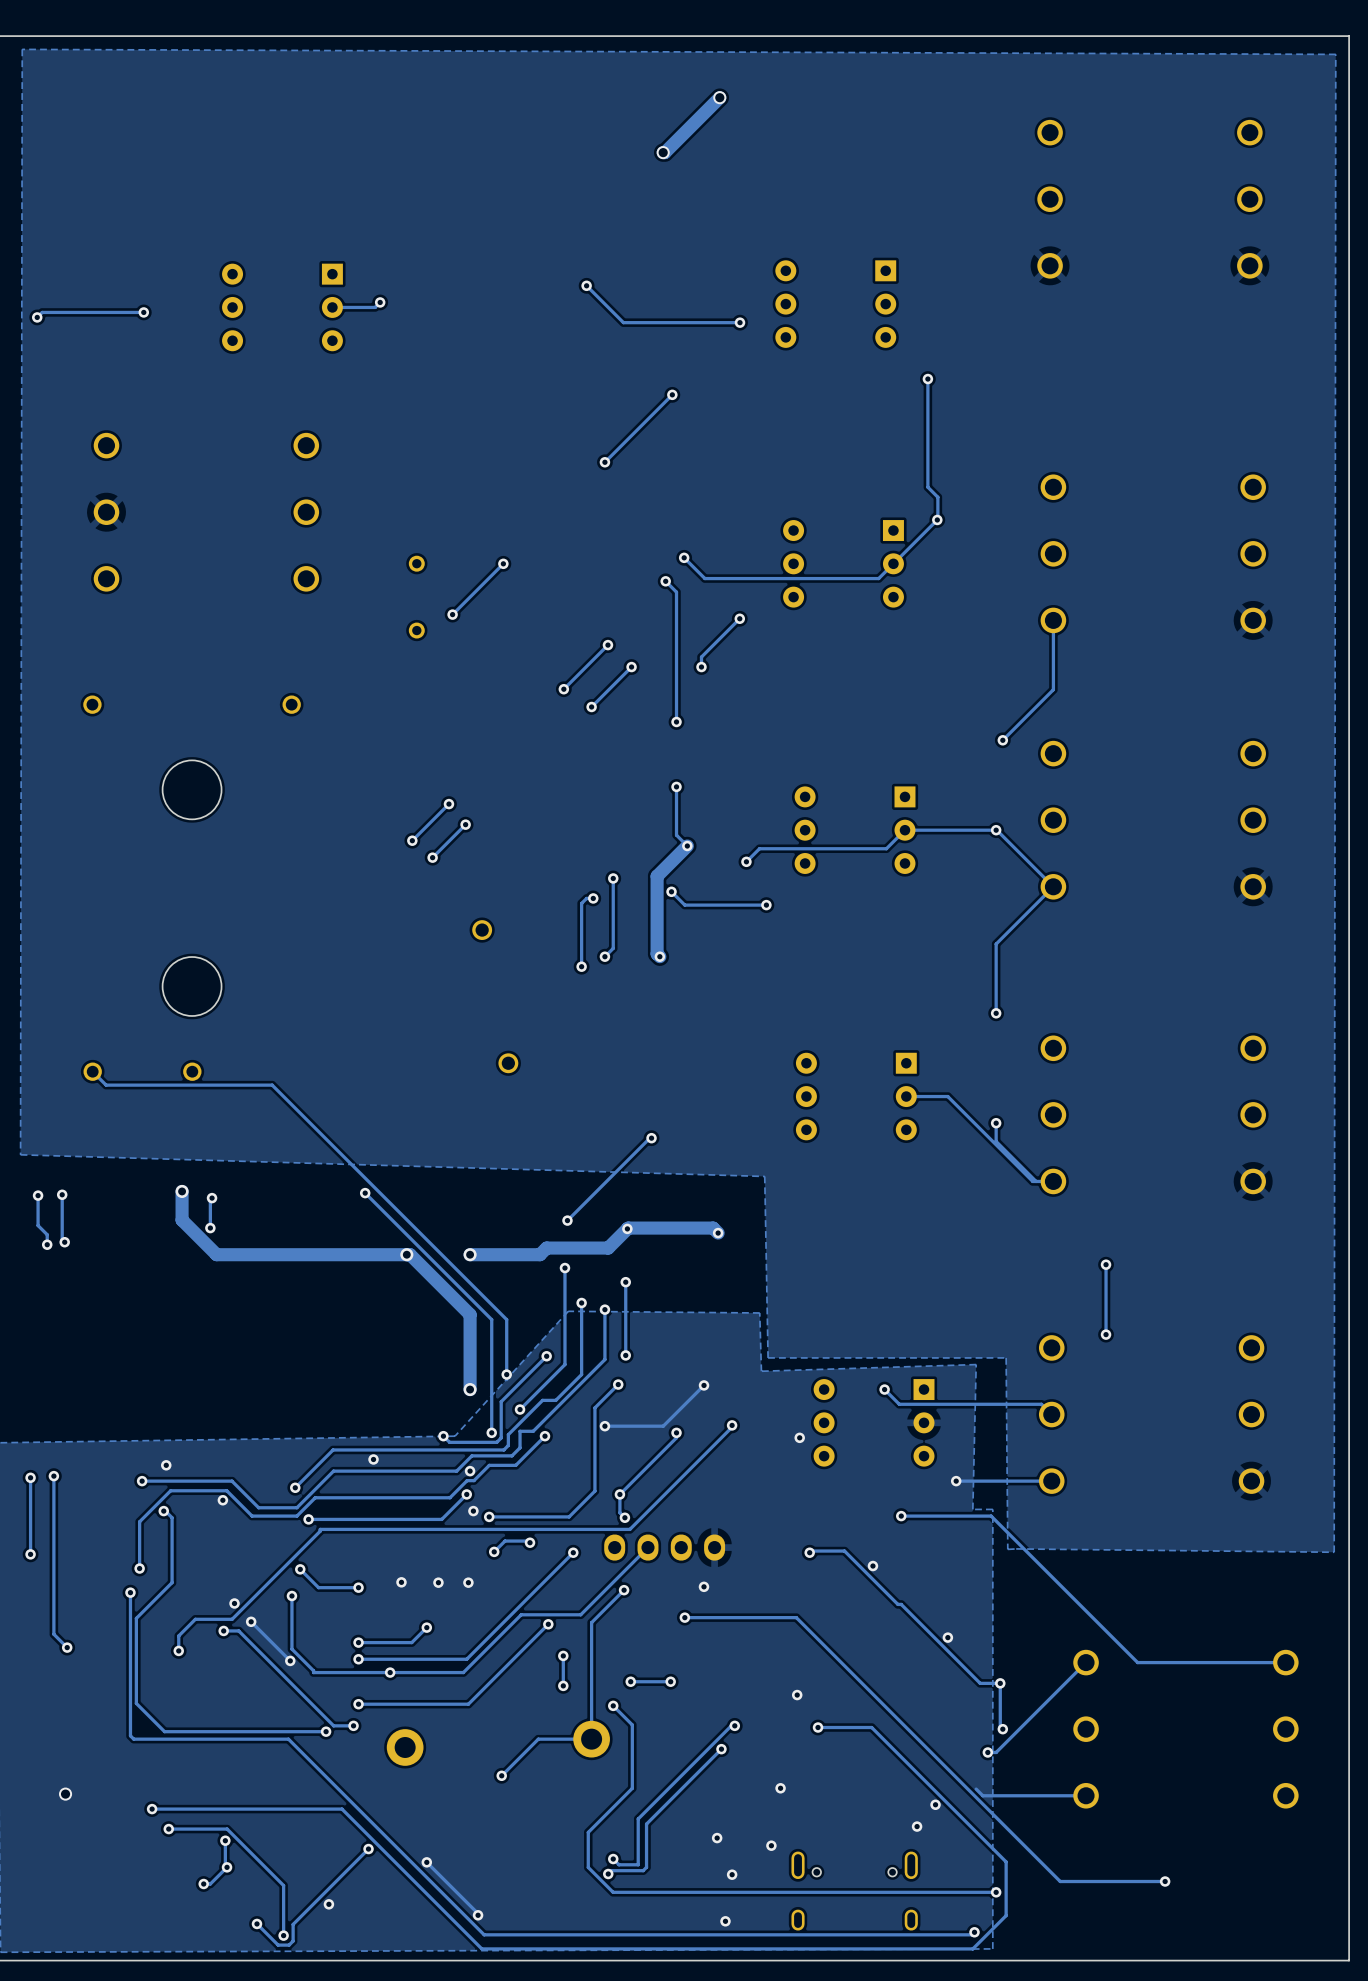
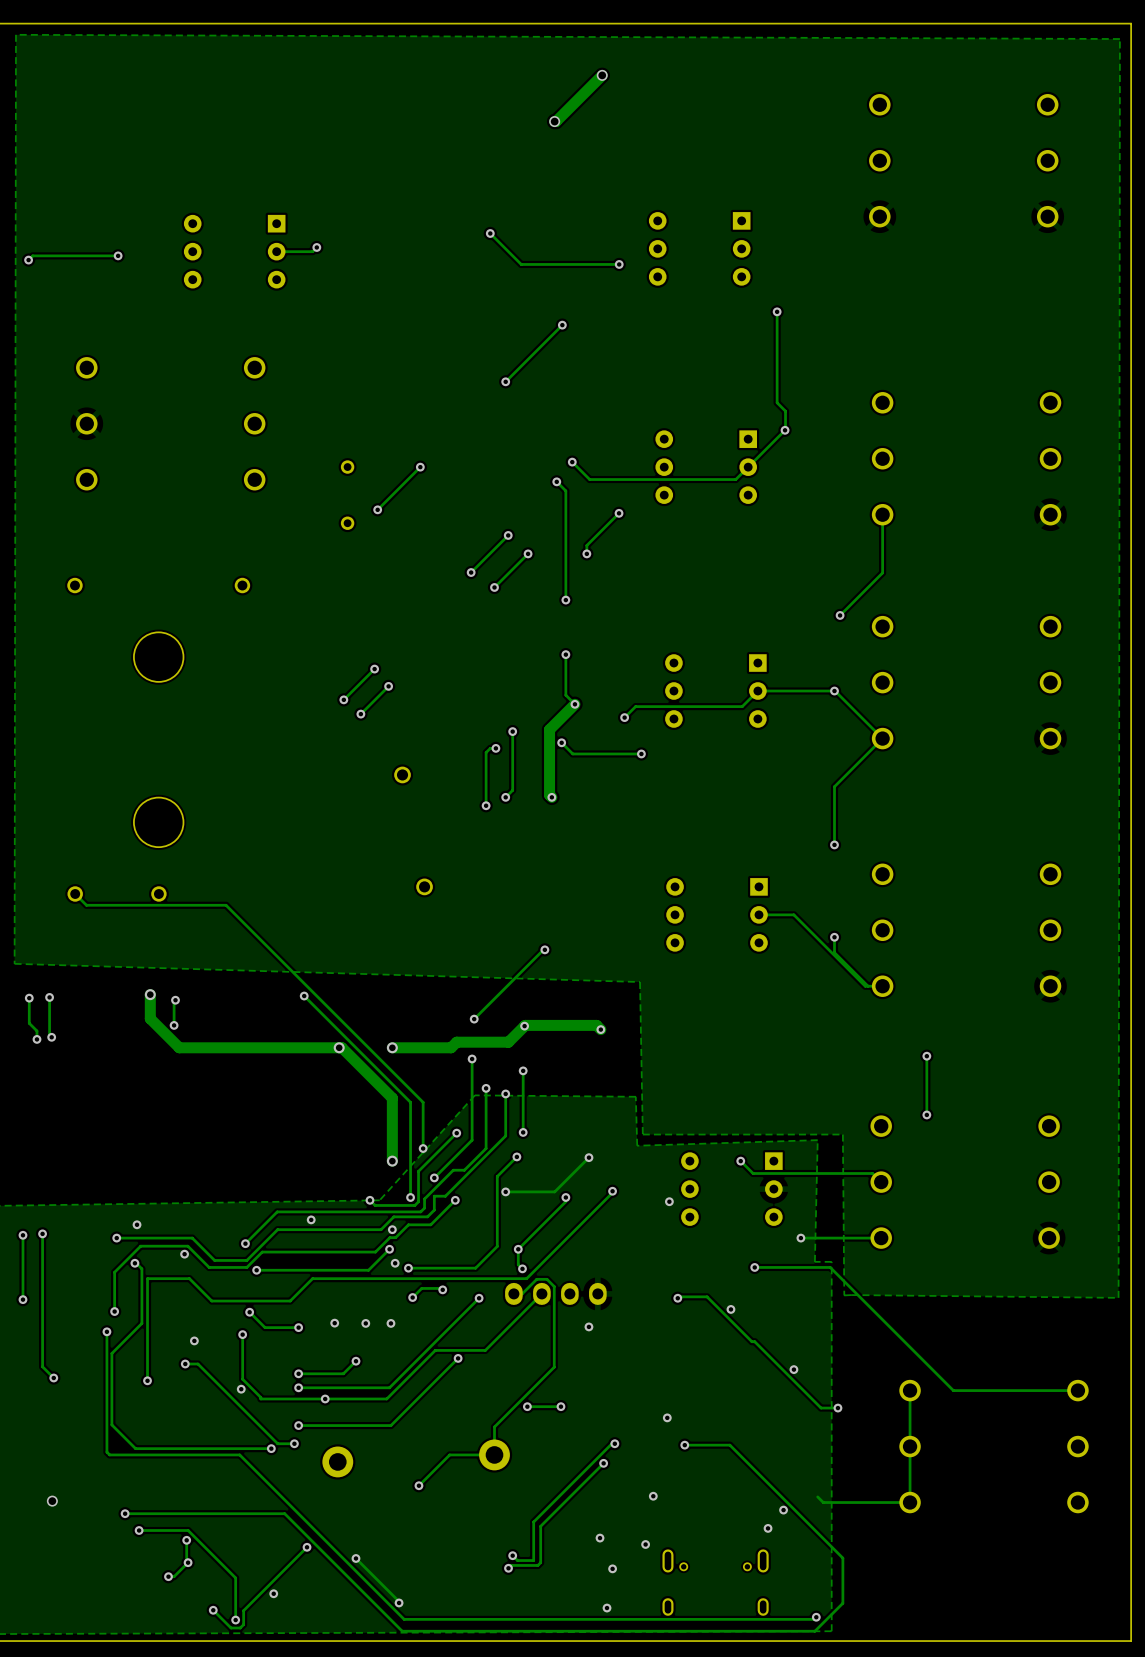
track: (375, 1529) (320, 1529) (232, 1619) (195, 1619) (178, 1635) -> (312, 1278) (290, 1301) (211, 1301) (189, 1278) (147, 1278) (147, 1368)
track: (624, 1590) (591, 1622) (591, 1705) -> (513, 1293) (522, 1293) (536, 1279) (547, 1279) (554, 1286) (554, 1367) (494, 1426)
via: (624, 1590) -> none
track: (684, 1617) (796, 1617) (1060, 1881) (1165, 1881) -> none
via: (684, 1617) -> none
track: (251, 1621) (290, 1660) -> none
via: (251, 1621) -> none
track: (563, 1655) (563, 1685) -> none
via: (563, 1655) -> none
track: (1086, 1662) (996, 1752) (987, 1752) -> (910, 1390) (910, 1502)
track: (1000, 1683) (1000, 1726) (1002, 1729) -> none
via: (563, 1685) -> none
track: (613, 1705) (632, 1724) (632, 1788) (588, 1832) (588, 1867) (613, 1892) (996, 1892) -> none
via: (613, 1705) -> none
via: (1002, 1729) -> none
via: (987, 1752) -> none
via: (1165, 1881) -> none
via: (996, 1892) -> none

